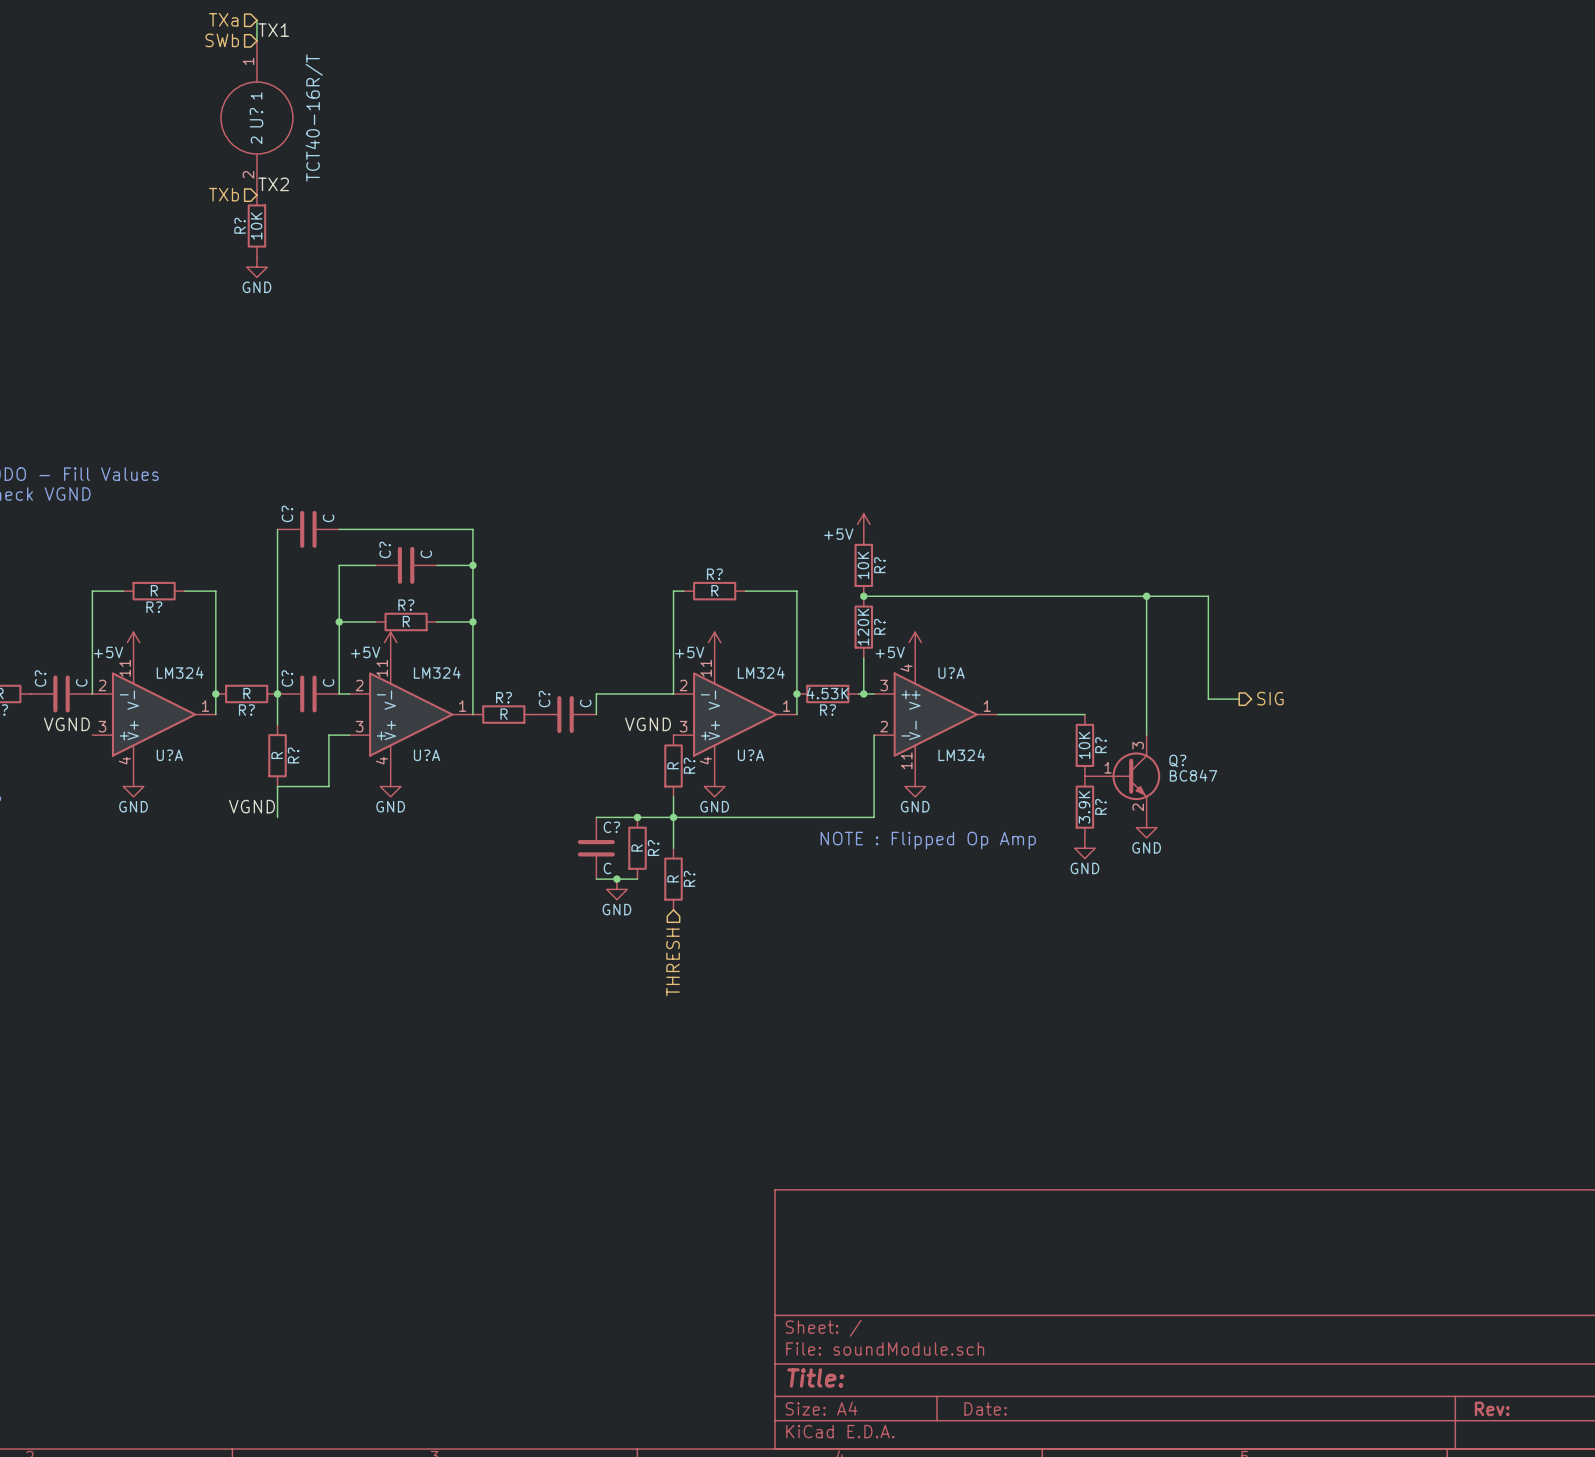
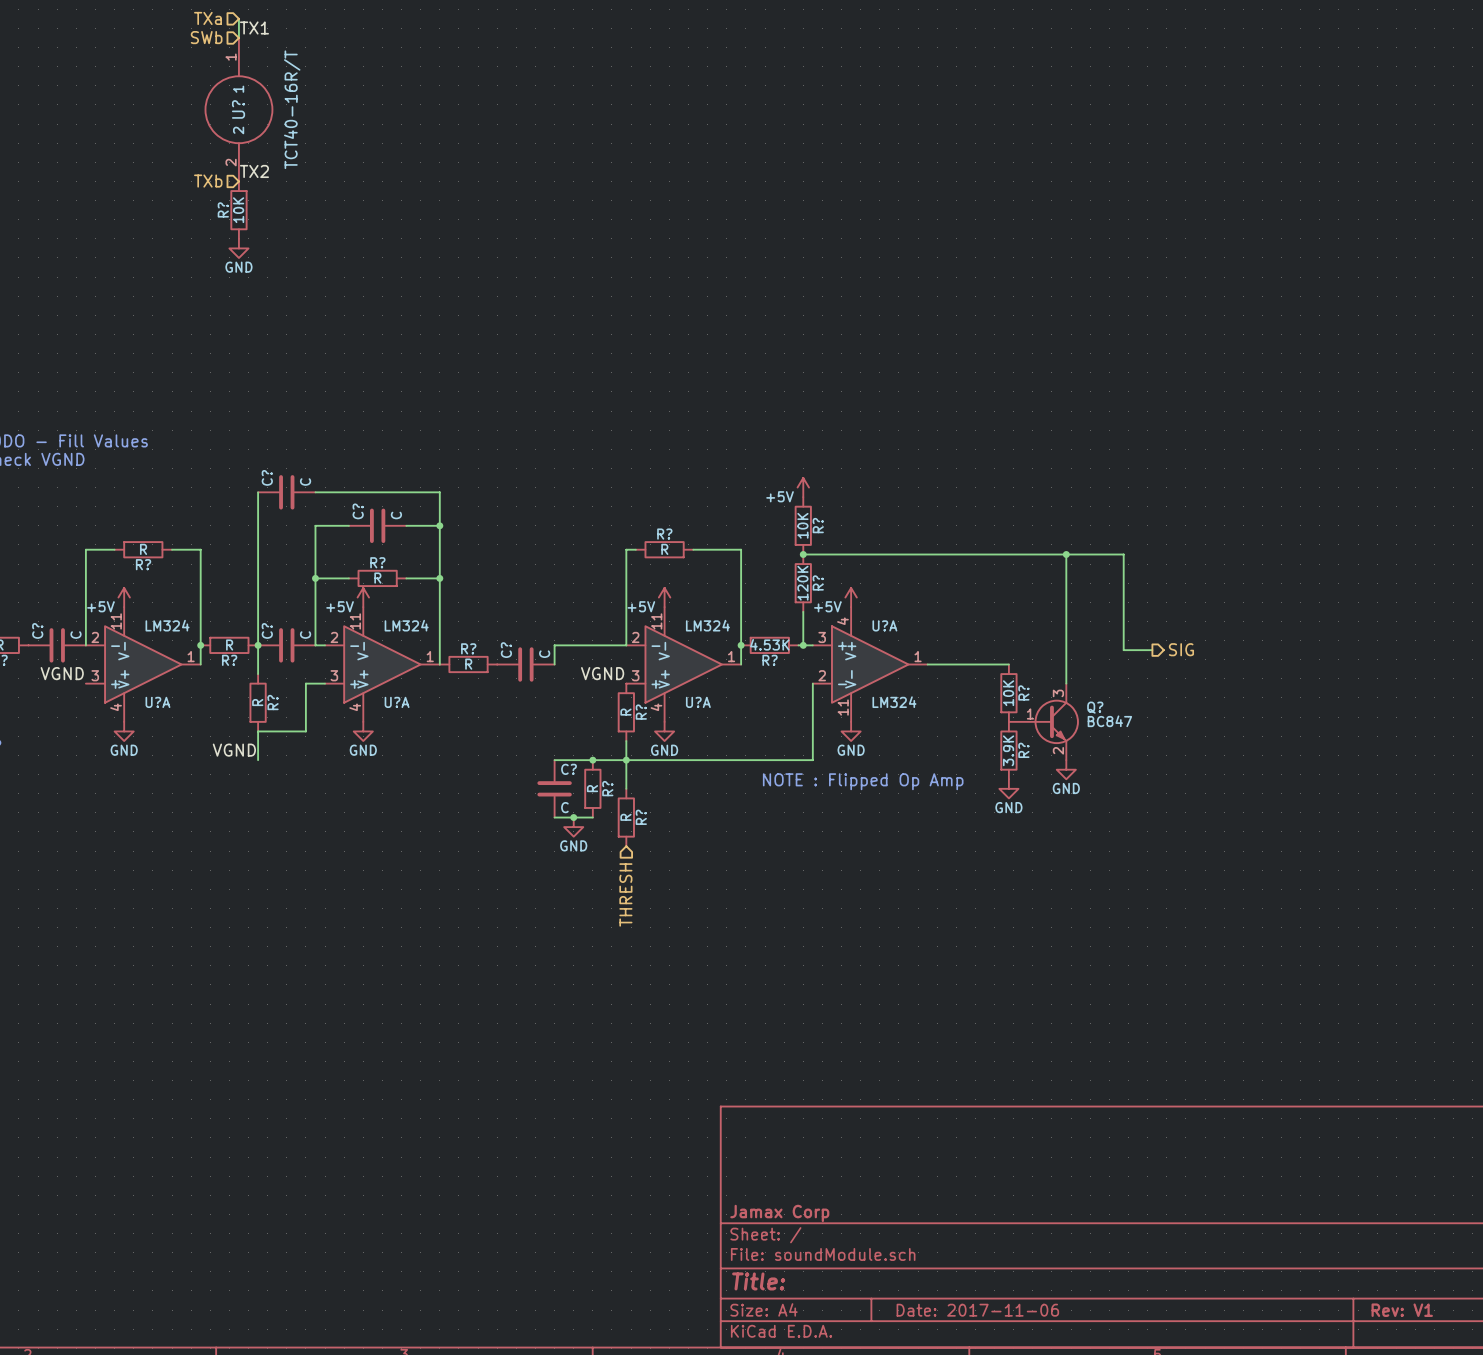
title block: none -> Jamax Corp (779, 1213)
title block: Date: (985, 1408) -> Date: 2017-11-06 (977, 1310)
title block: Rev: (1492, 1408) -> Rev: V1 (1402, 1310)

